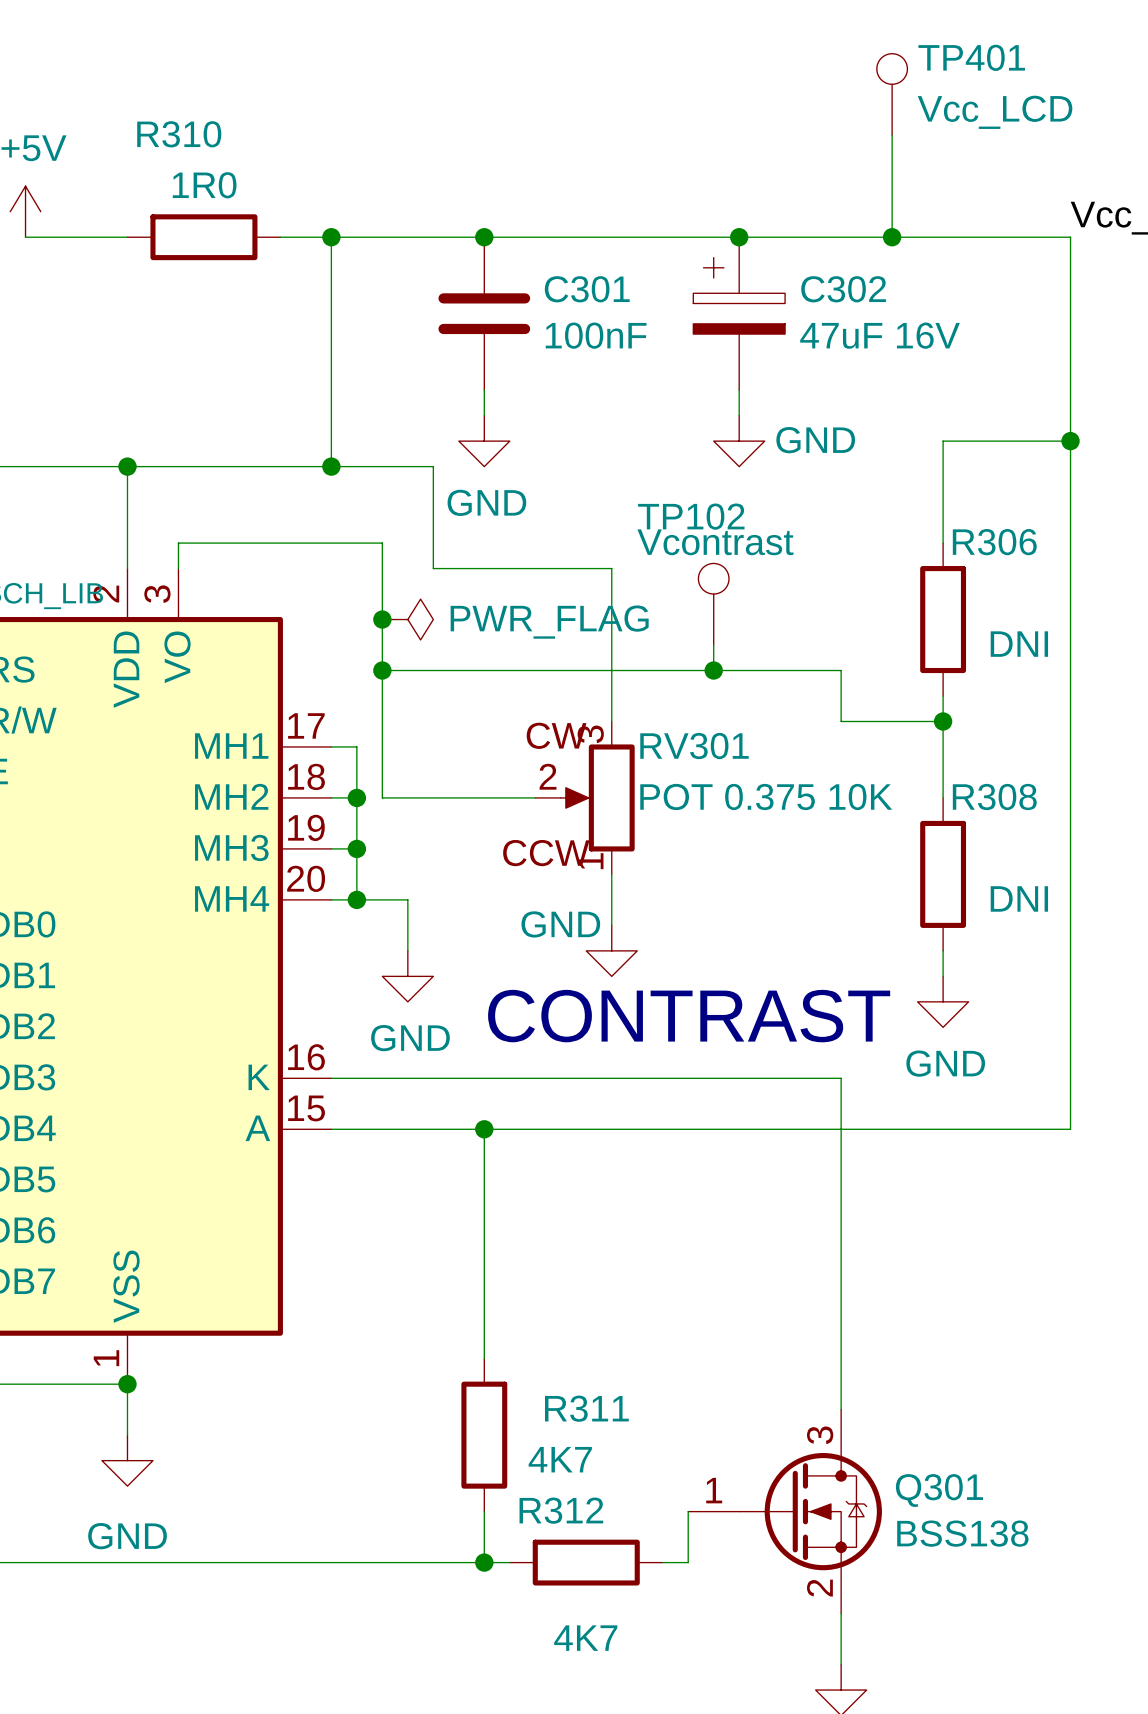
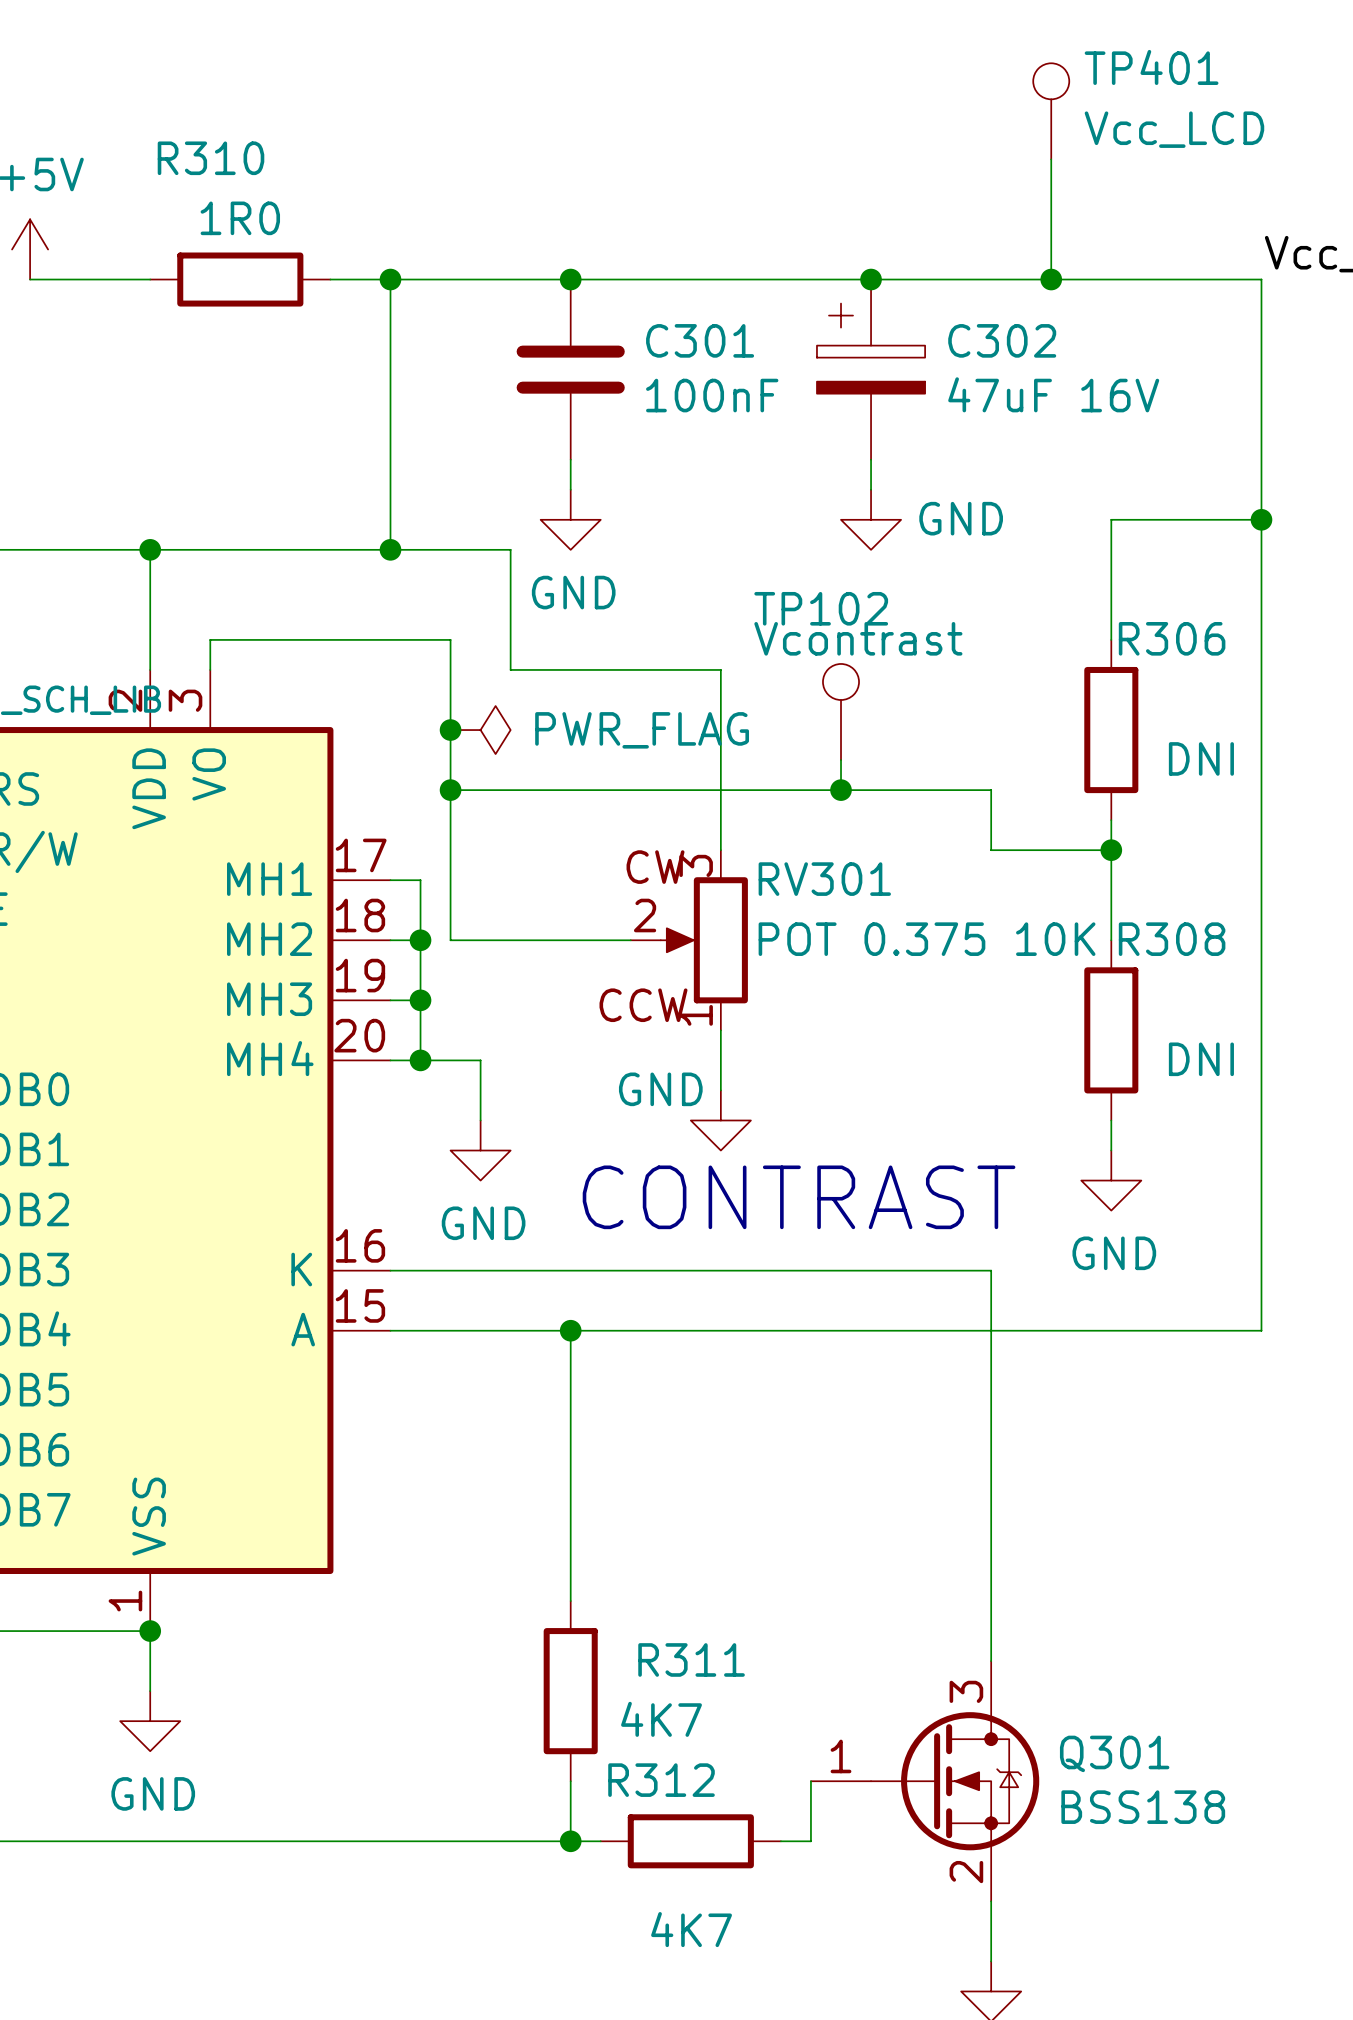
power symbol text position: GND (127, 1536) -> GND (153, 1793)

